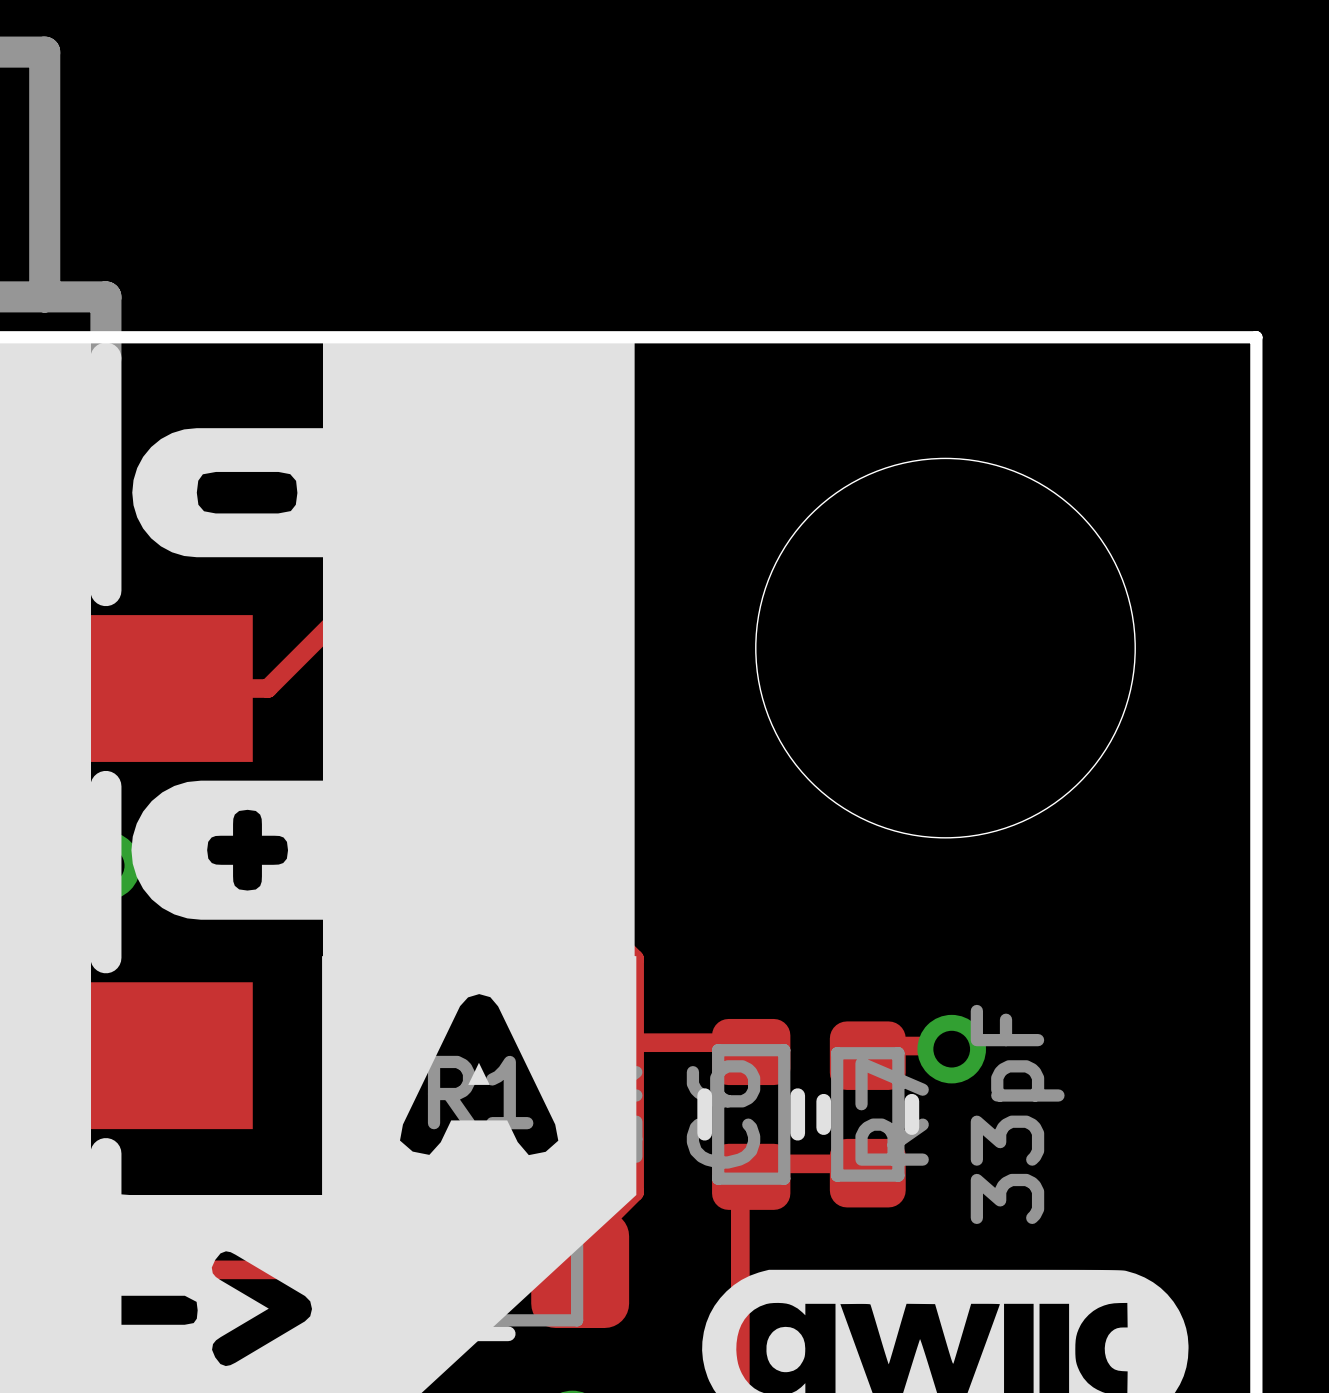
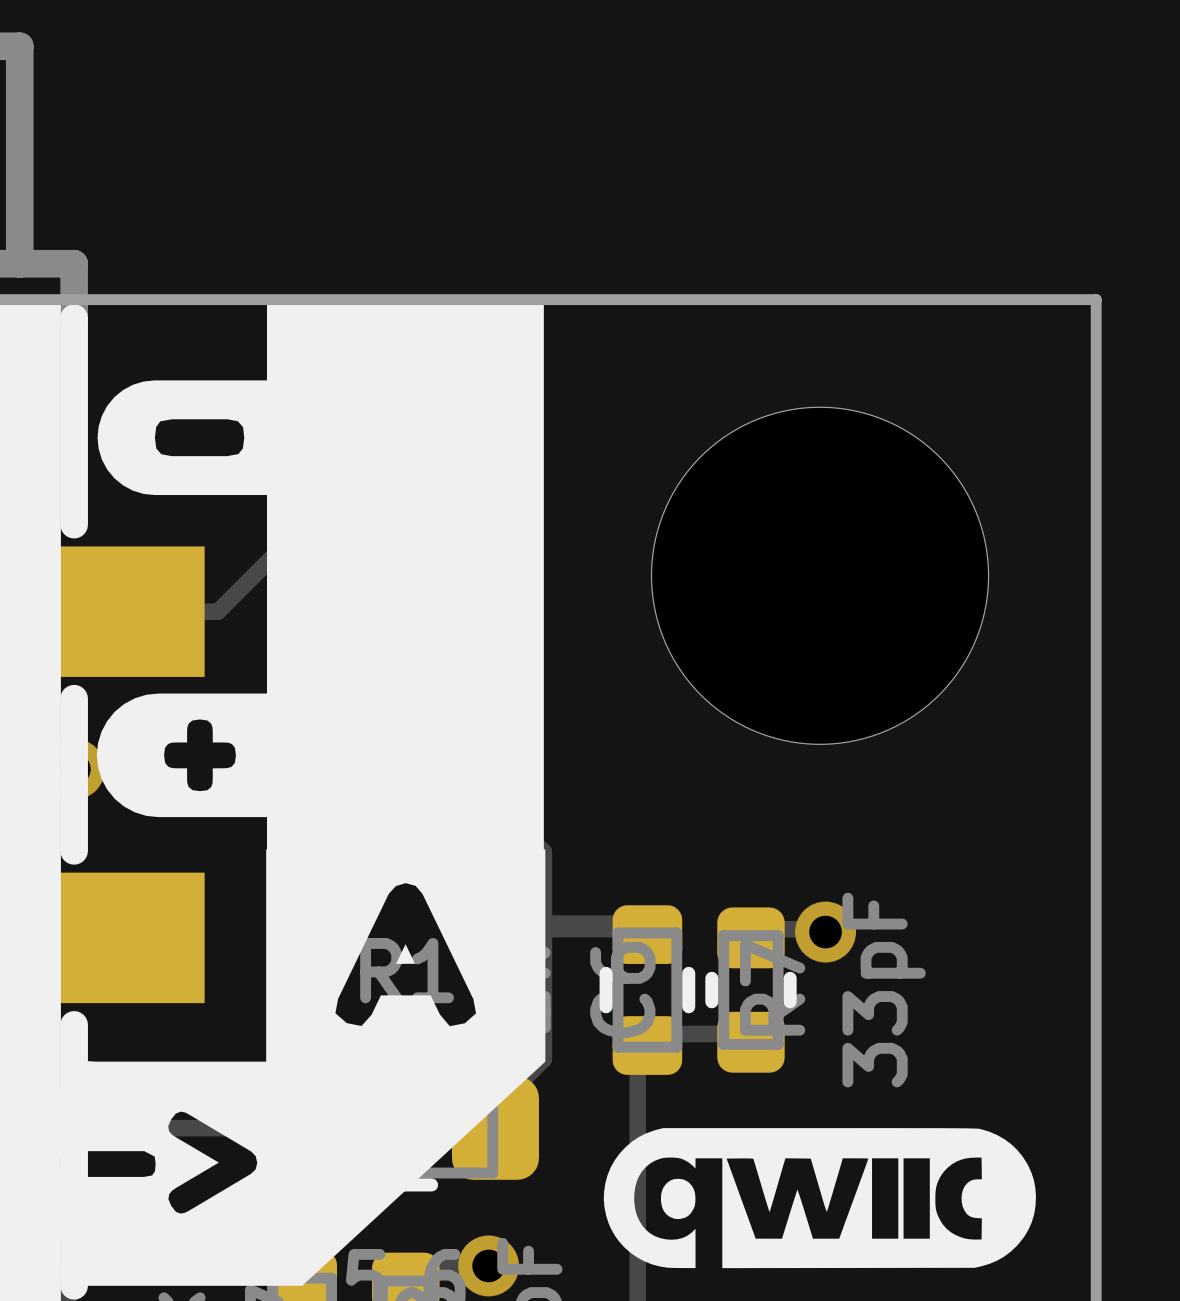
track width: thin (634, 1042) (740, 1042) -> thick (544, 926) (637, 926)

